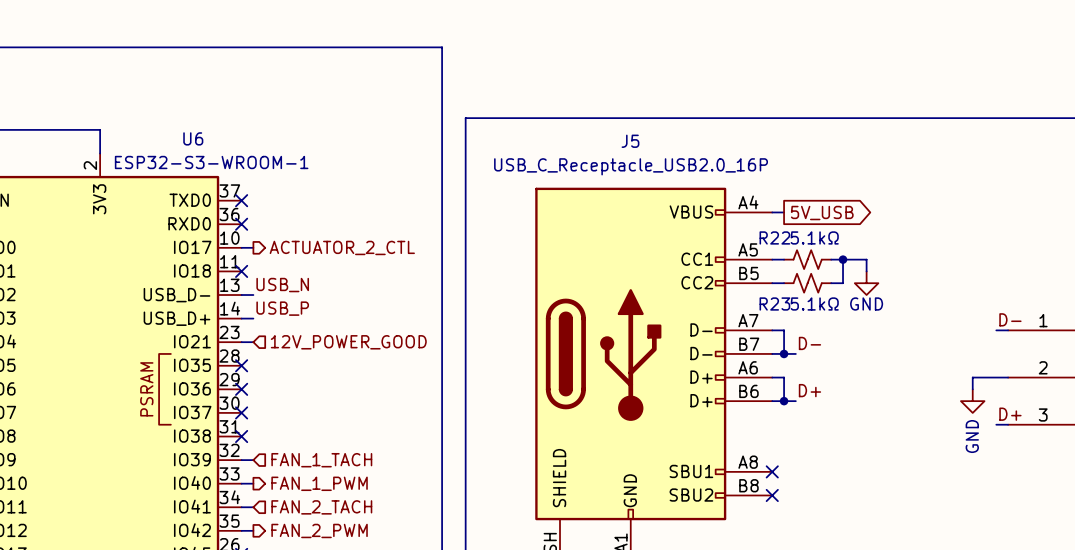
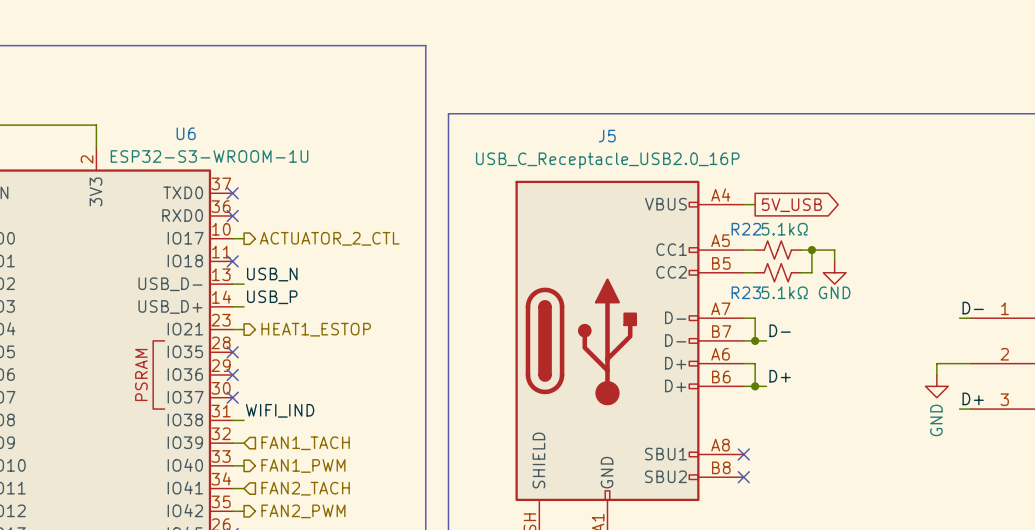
U6 value: ESP32-S3-WROOM-1 (211, 162) -> ESP32-S3-WROOM-1U (209, 156)
hierarchical label shape: input (348, 342) -> output (316, 329)
hierarchical label: 12V_POWER_GOOD (348, 342) -> HEAT1_ESTOP (316, 329)
label: none -> WIFI_IND (280, 410)
wire: none -> (232, 420) (244, 420)
no-connect mark: (241, 436) -> none
hierarchical label: FAN_1_TACH (321, 460) -> FAN1_TACH (305, 443)
hierarchical label: FAN_1_PWM (319, 483) -> FAN1_PWM (303, 465)
hierarchical label: FAN_2_TACH (321, 507) -> FAN2_TACH (305, 488)
hierarchical label: FAN_2_PWM (319, 530) -> FAN2_PWM (303, 511)

